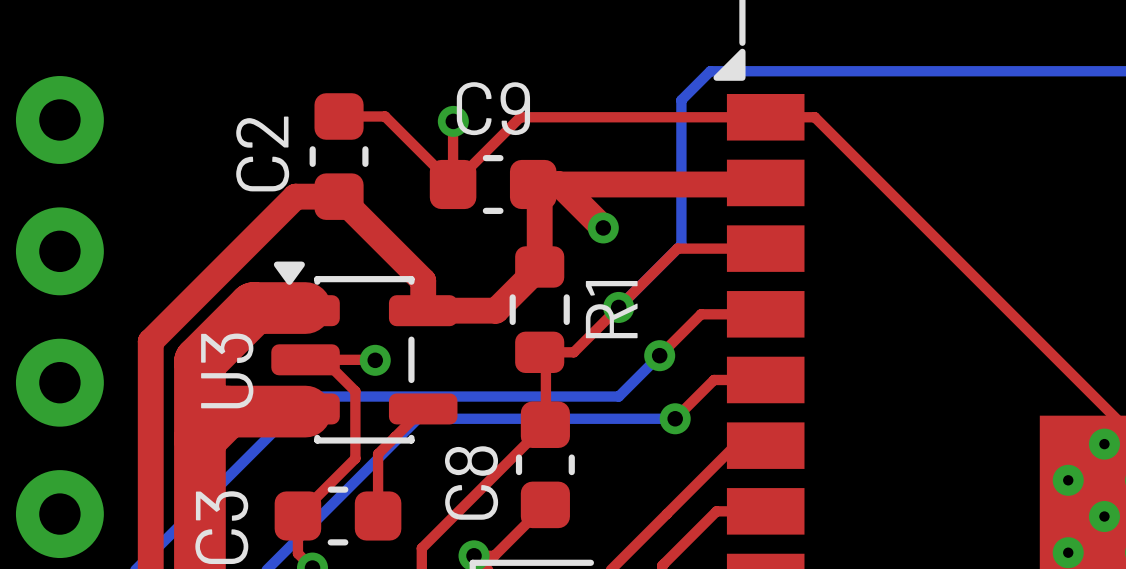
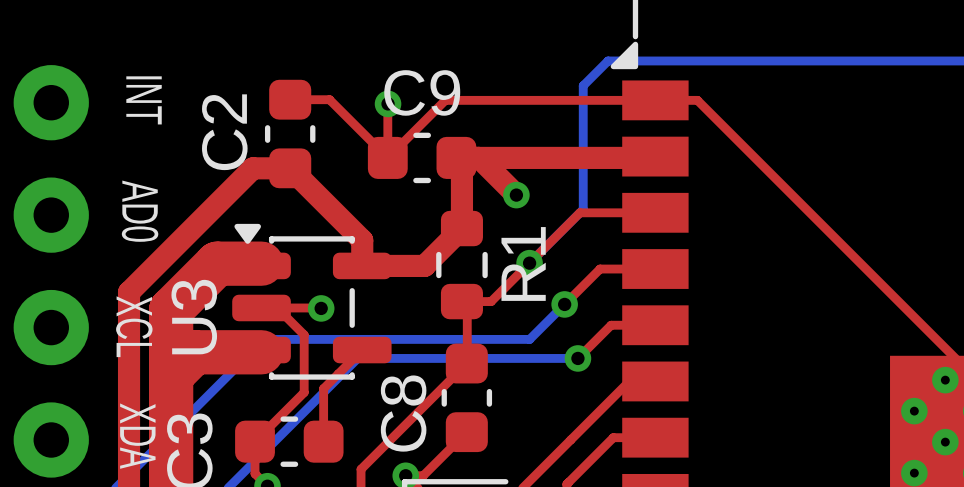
text: none -> INT (144, 100)
text: none -> AD0 (140, 211)
text: none -> XCL (134, 326)
text: none -> XDA (137, 436)

